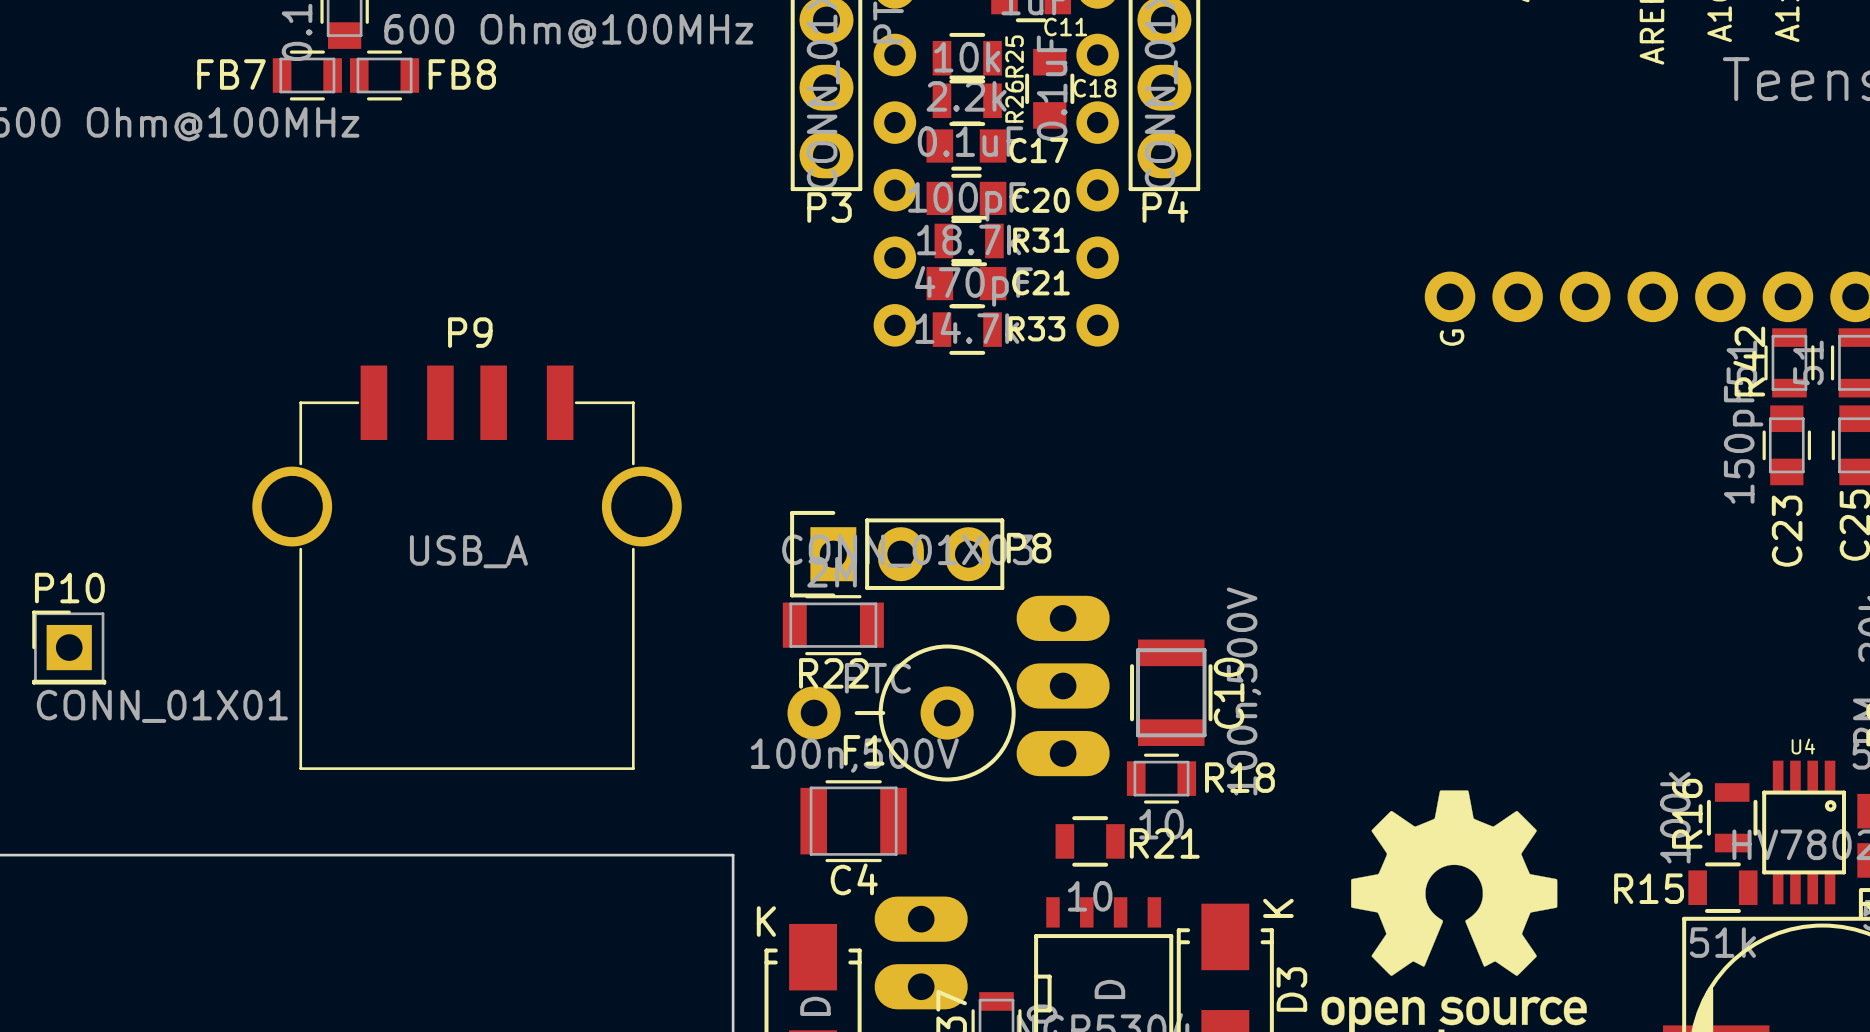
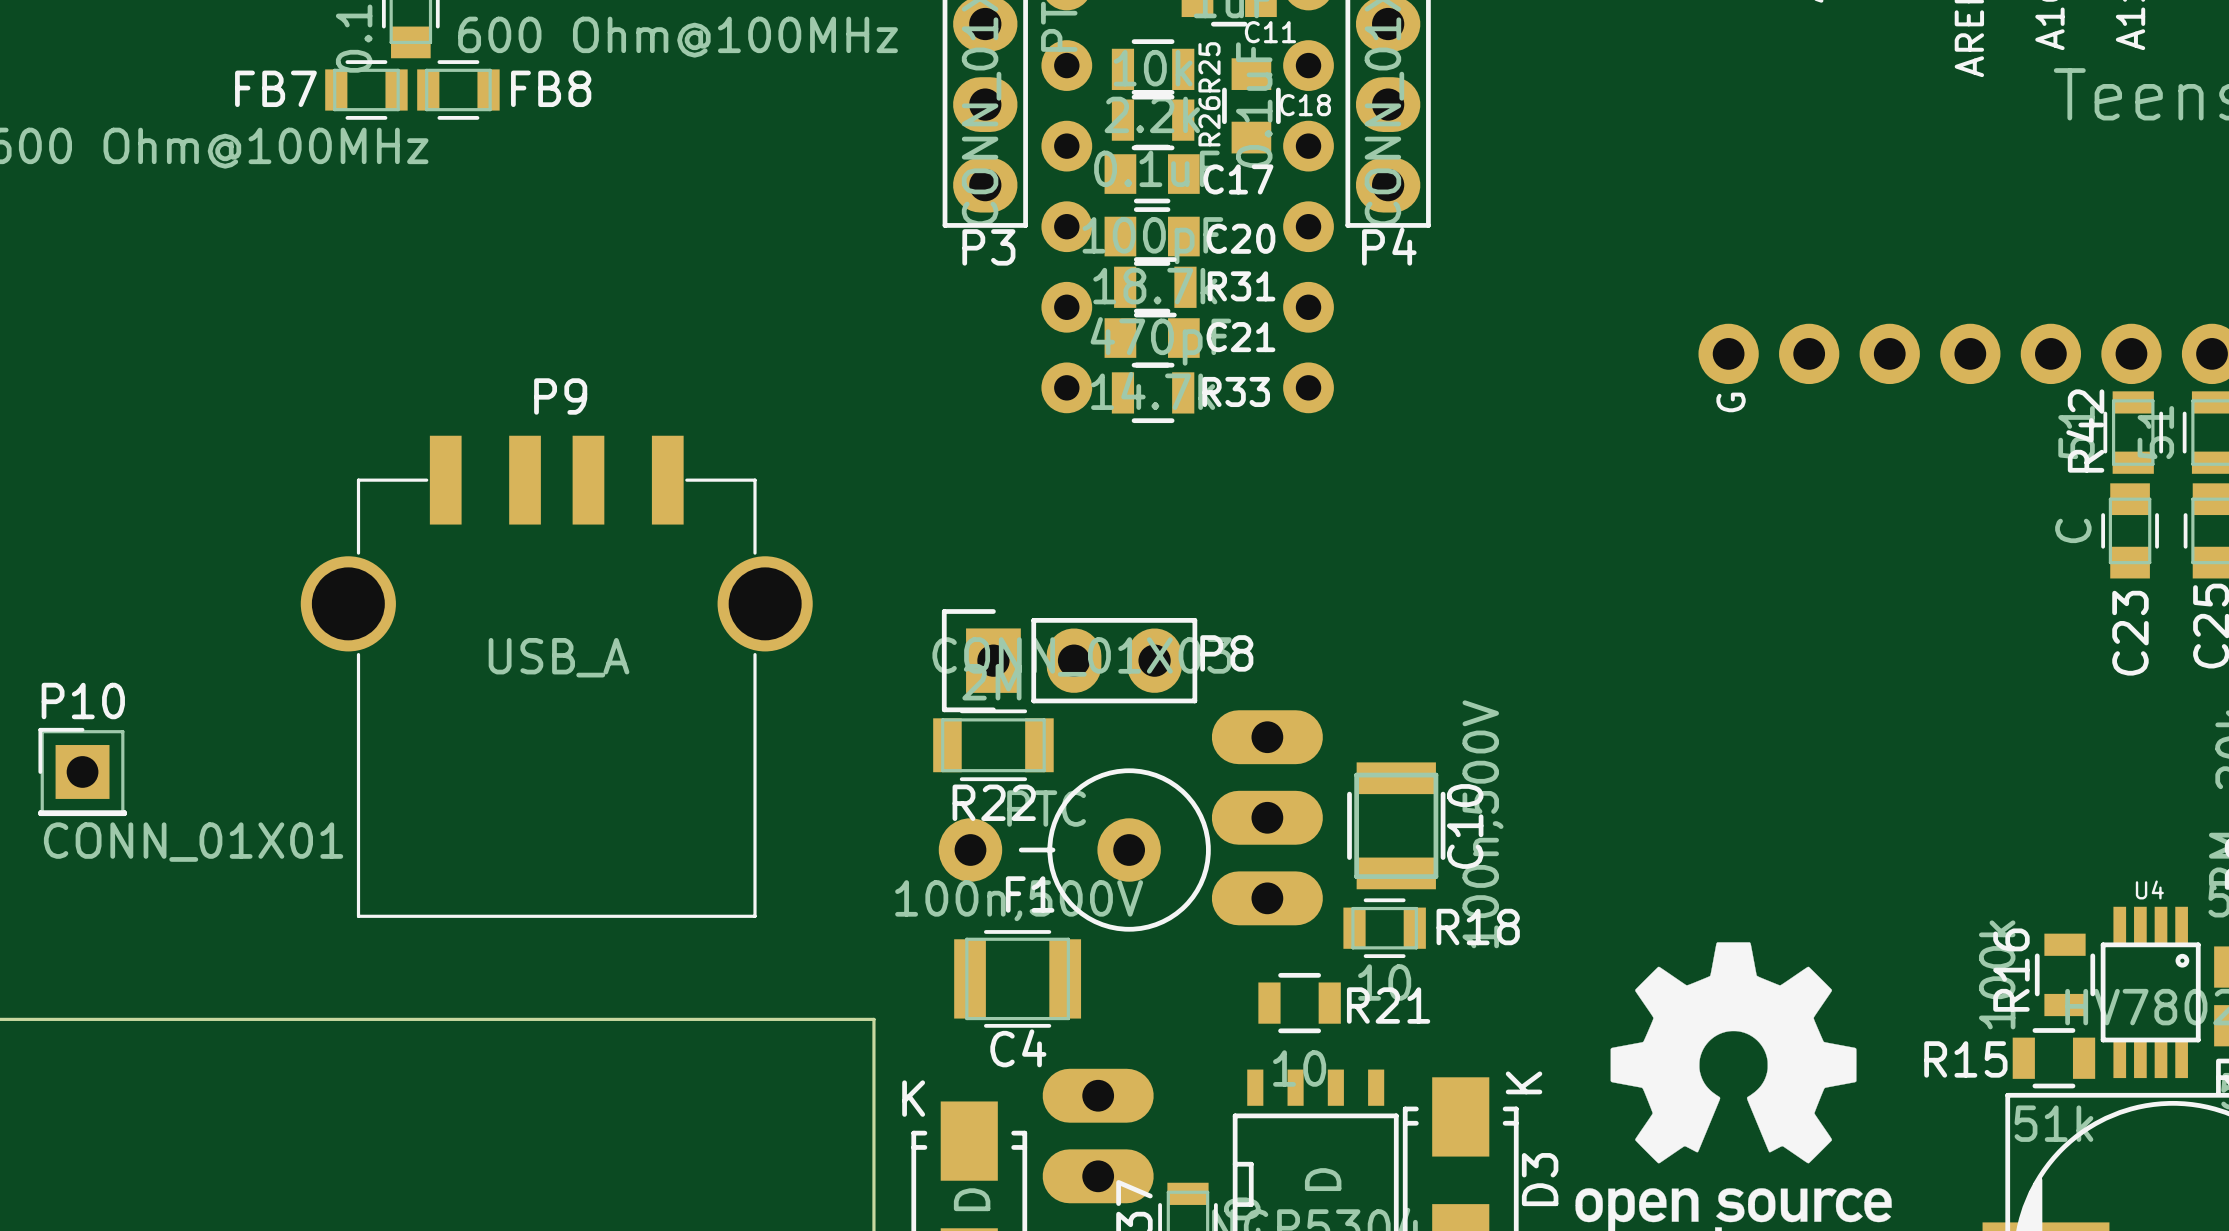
C23 value: 150pF (1743, 444) -> C (2073, 530)

